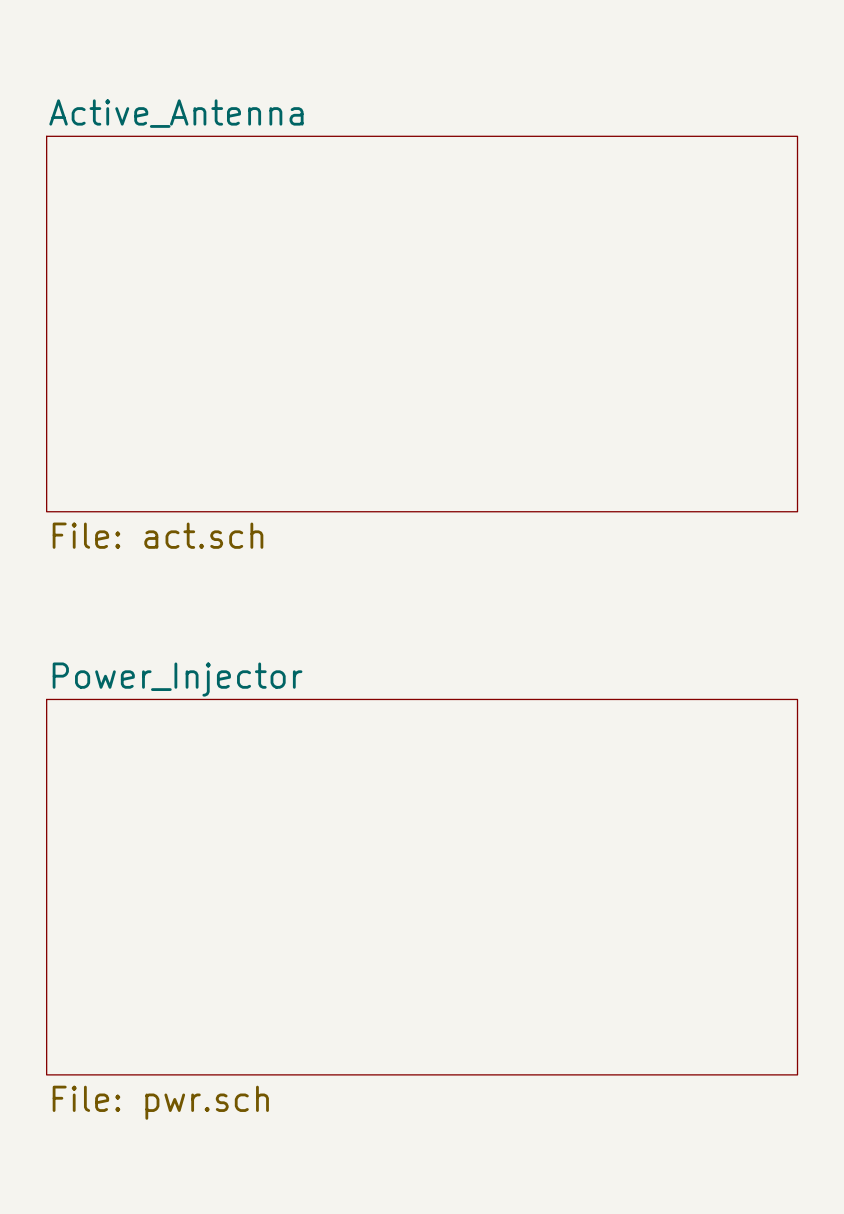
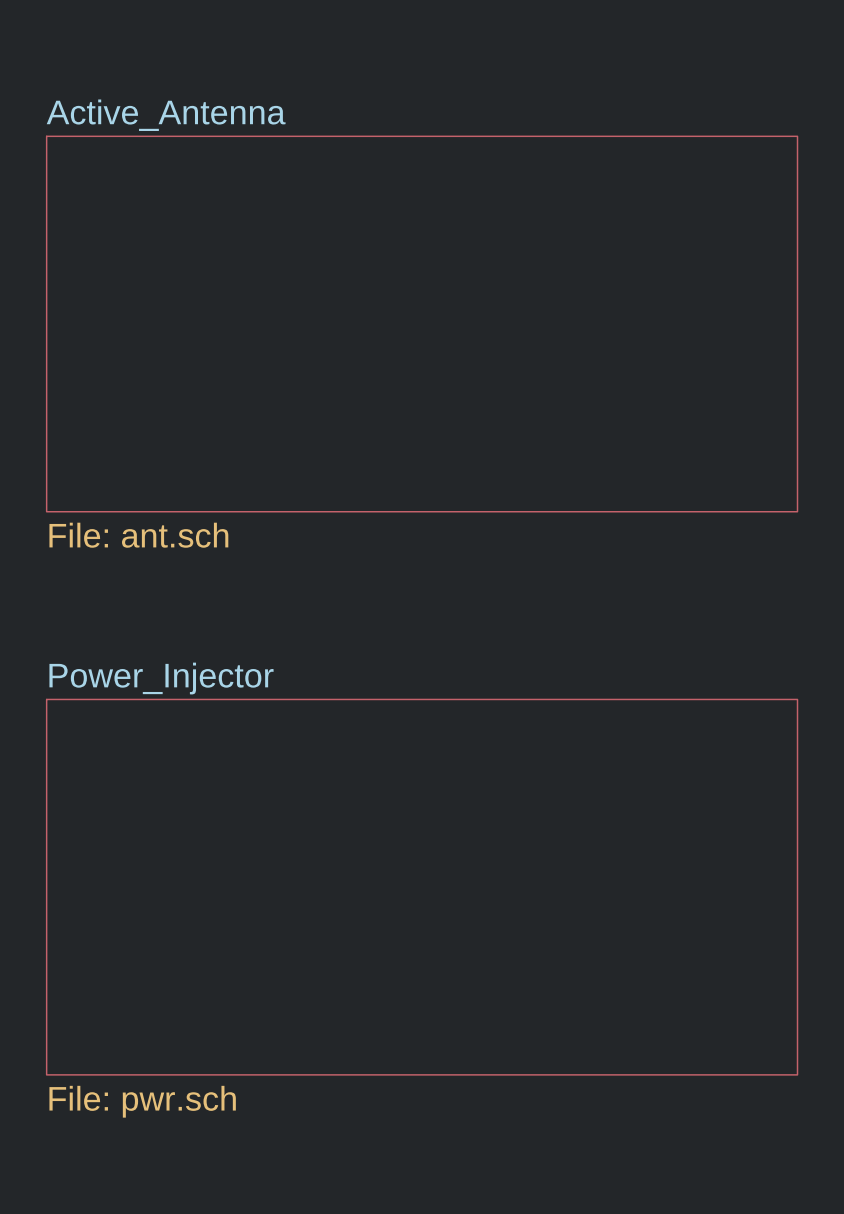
sheet Active_Antenna value: File: act.sch (158, 535) -> File: ant.sch (138, 535)

